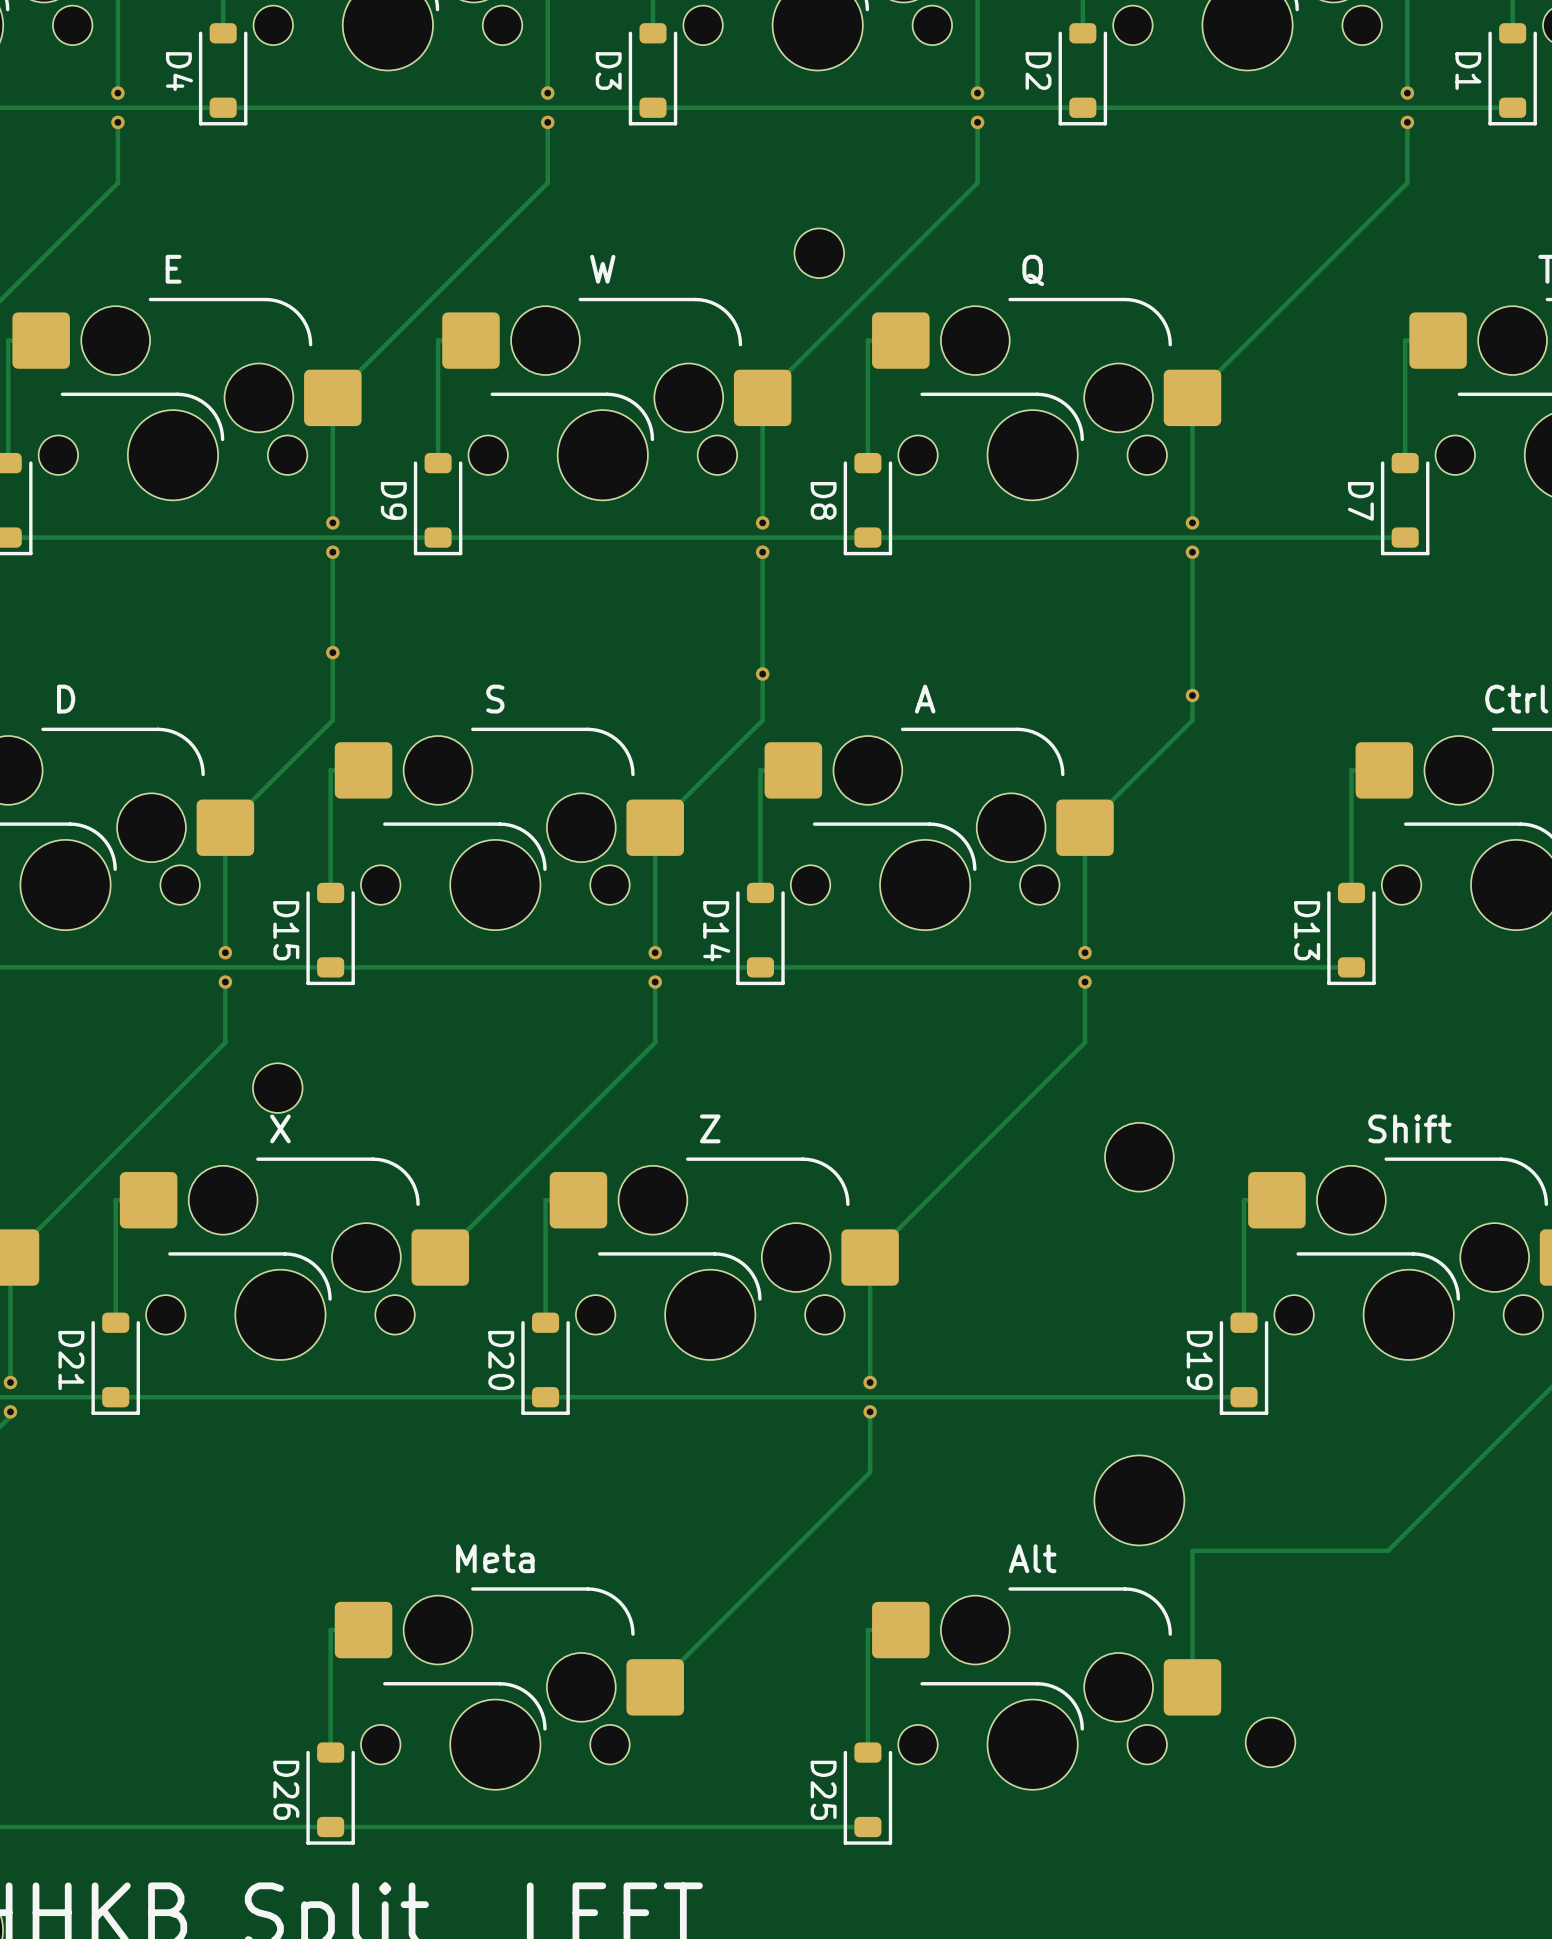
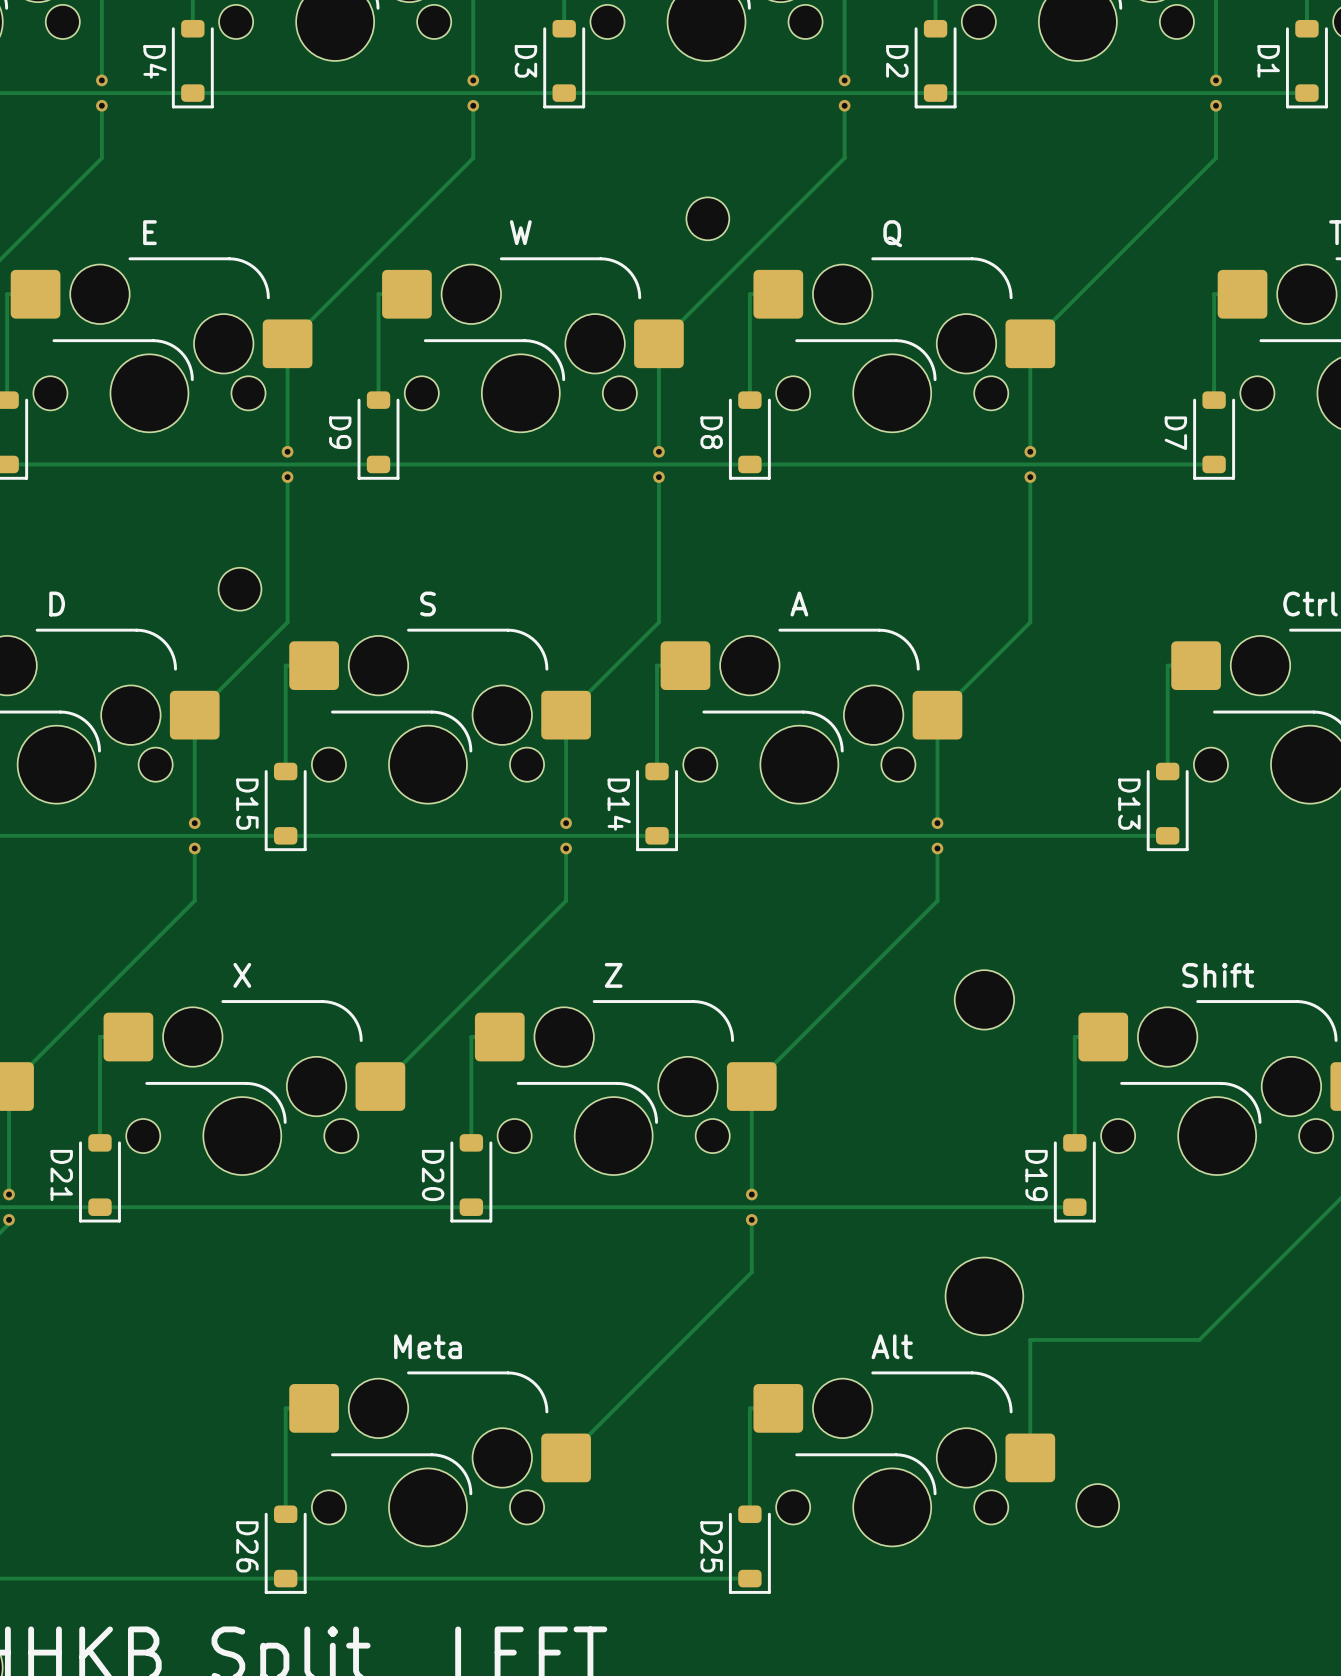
via: (332, 652) -> none
via: (762, 674) -> none
via: (1192, 695) -> none
part position: (277, 1088) -> (239, 589)

